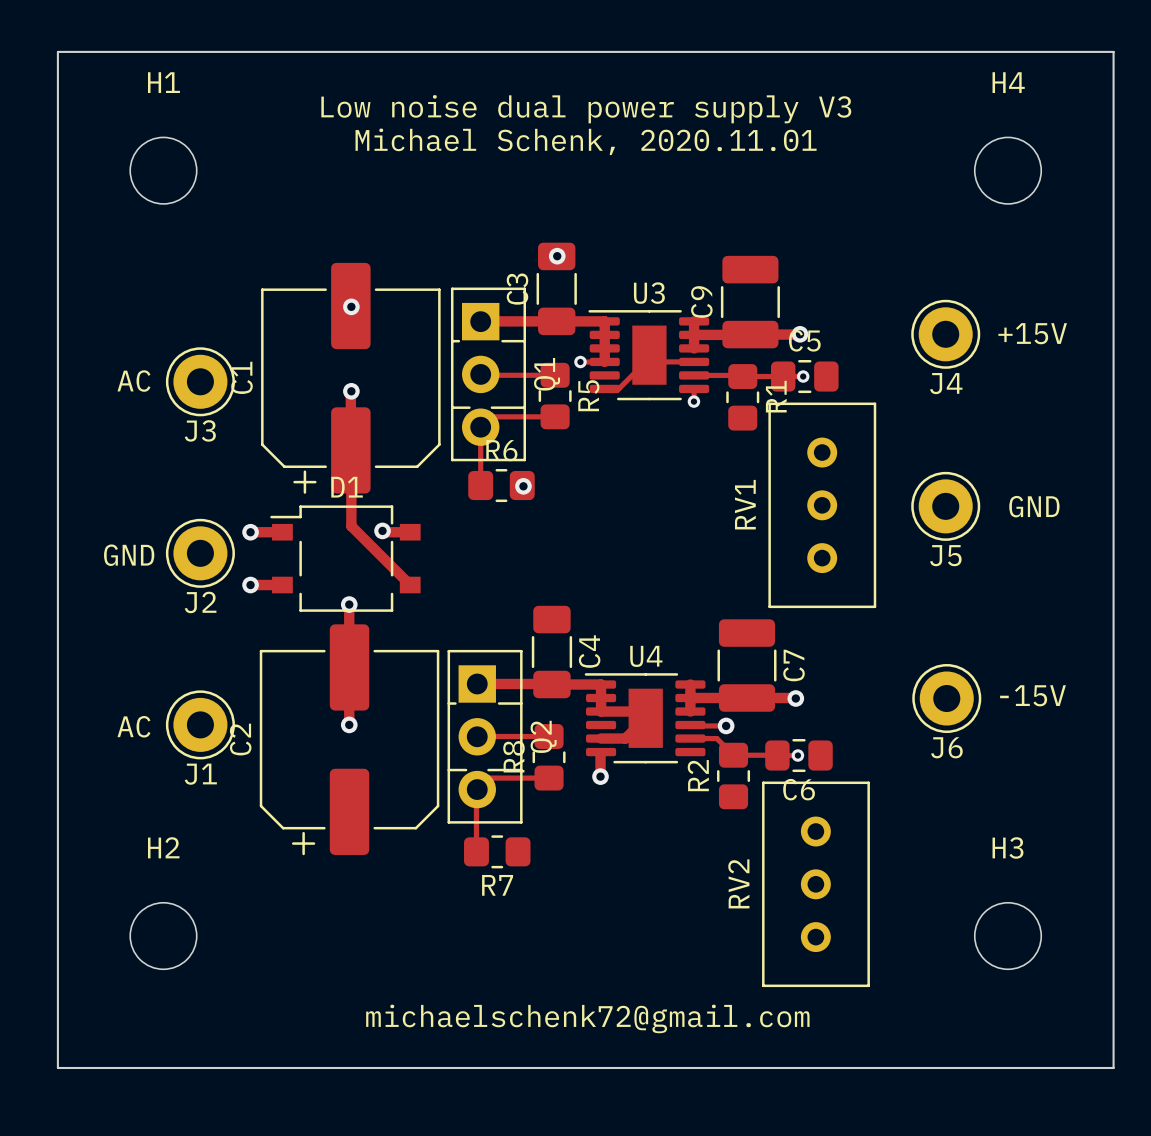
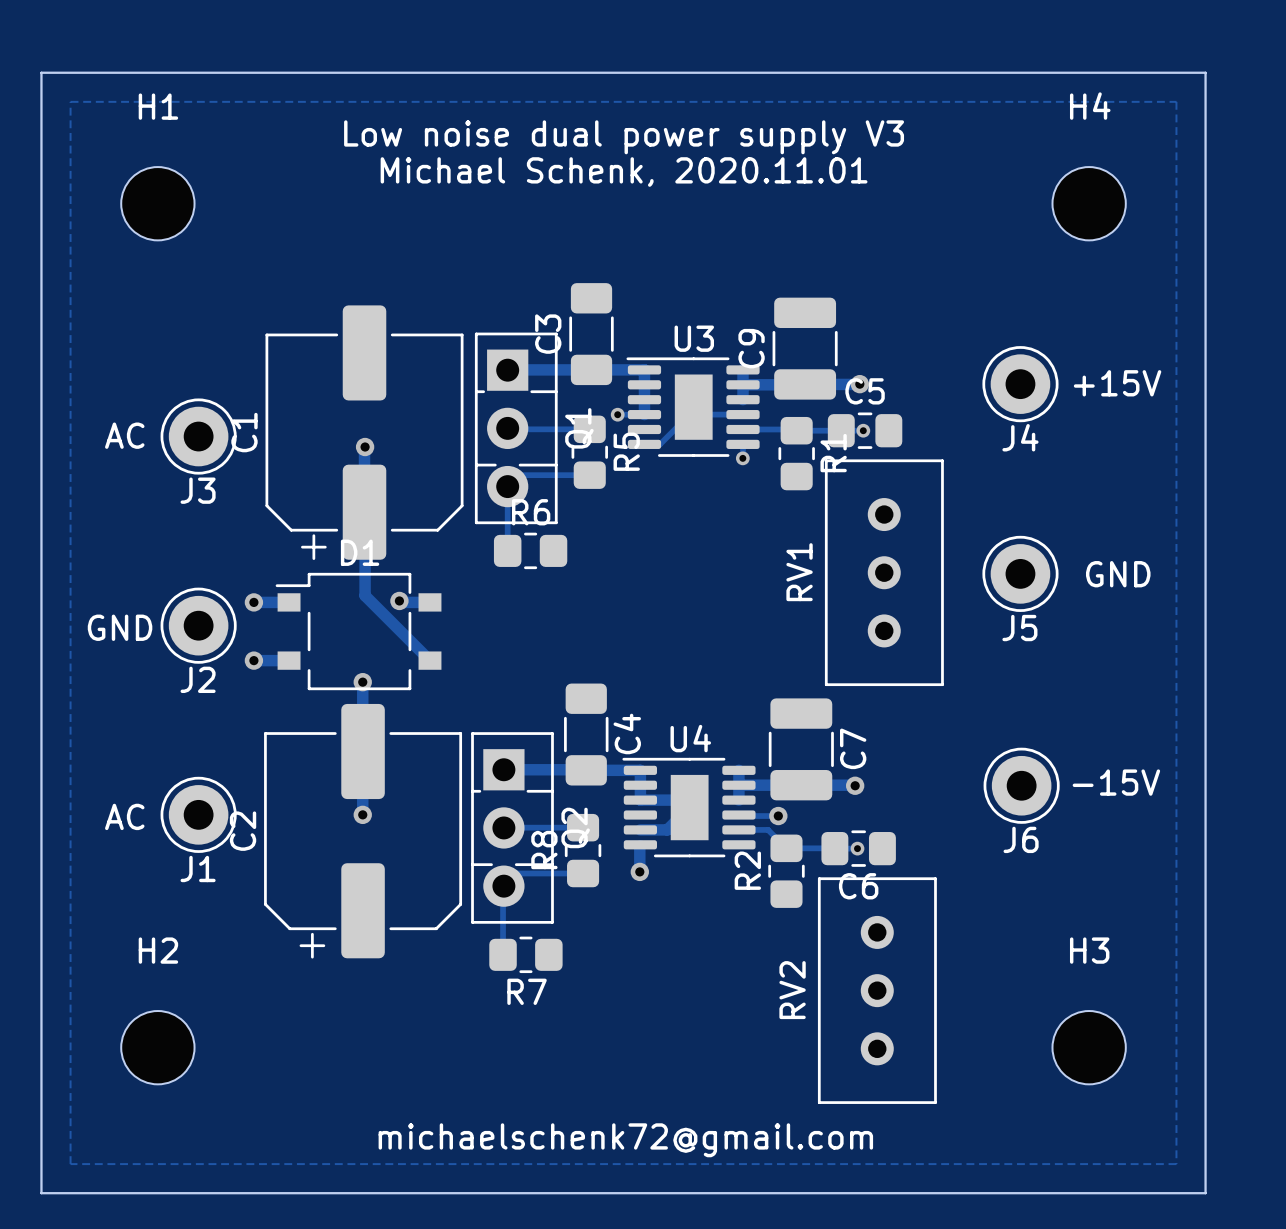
zone outline: none -> (70, 101) (70, 1164) (1176, 1164) (1176, 101) (70, 101)
via: (557, 256) -> none
via: (351, 306) -> none
via: (523, 486) -> none

